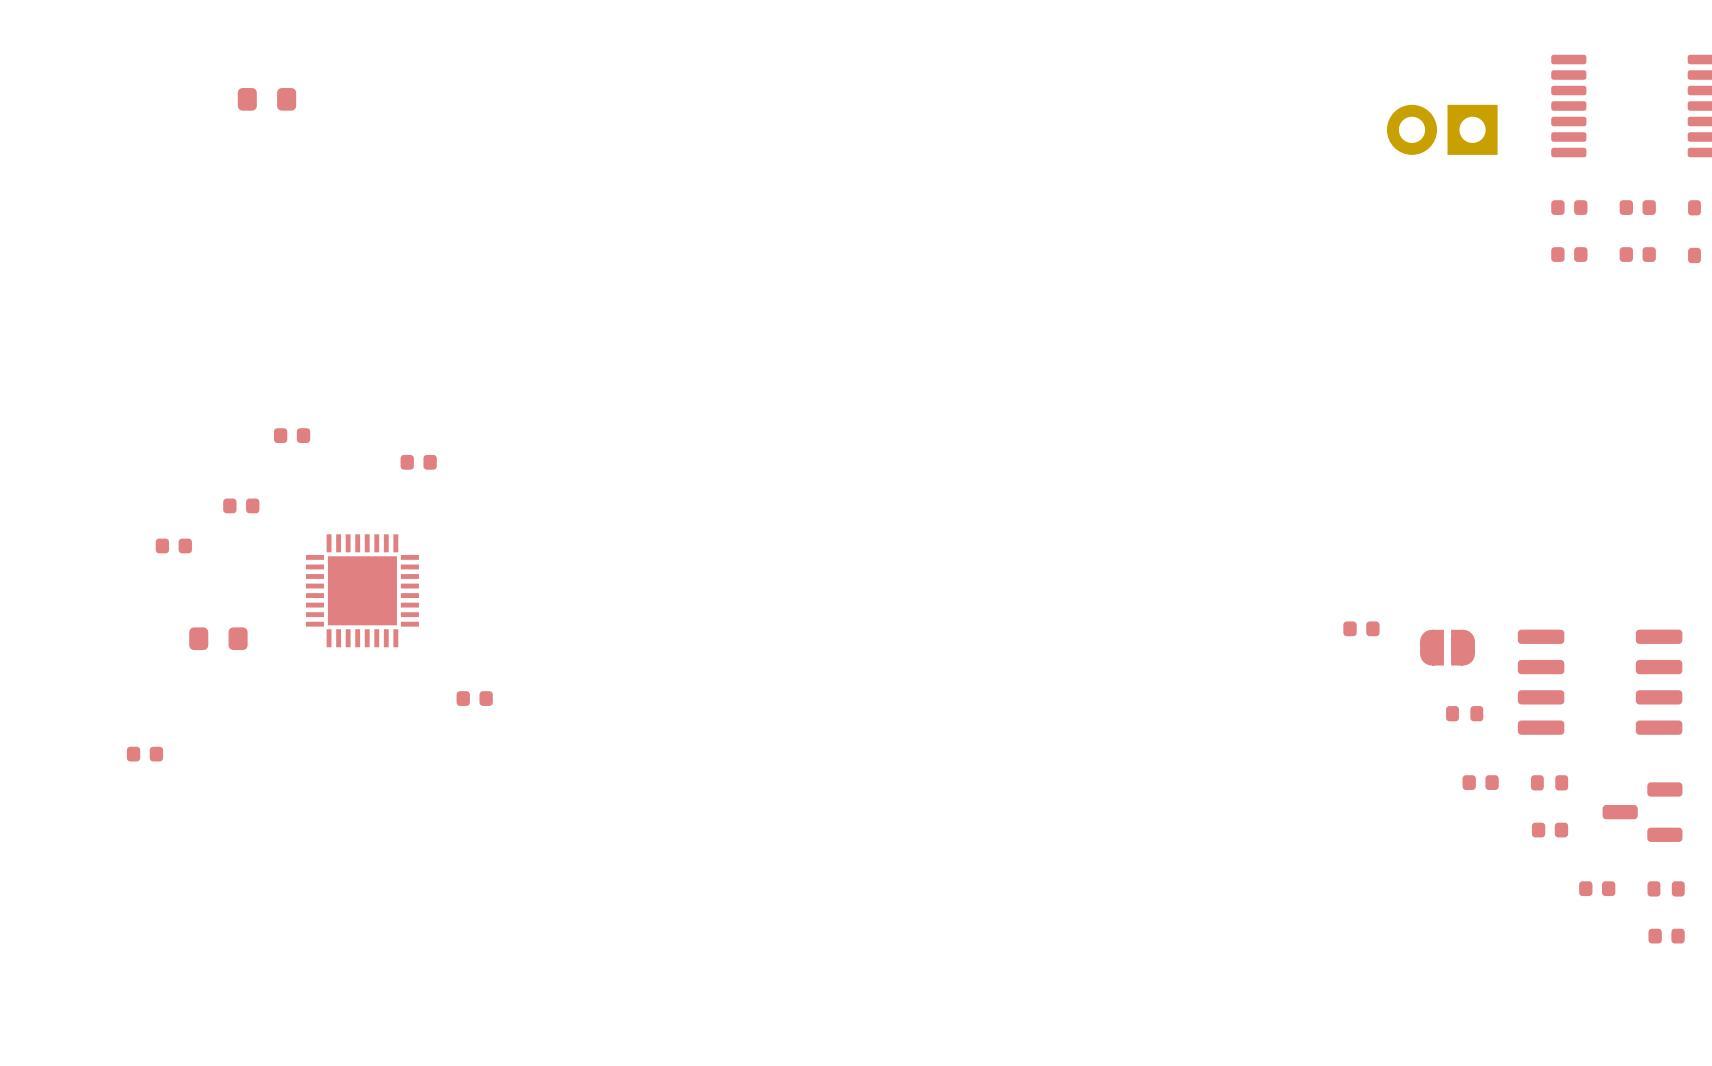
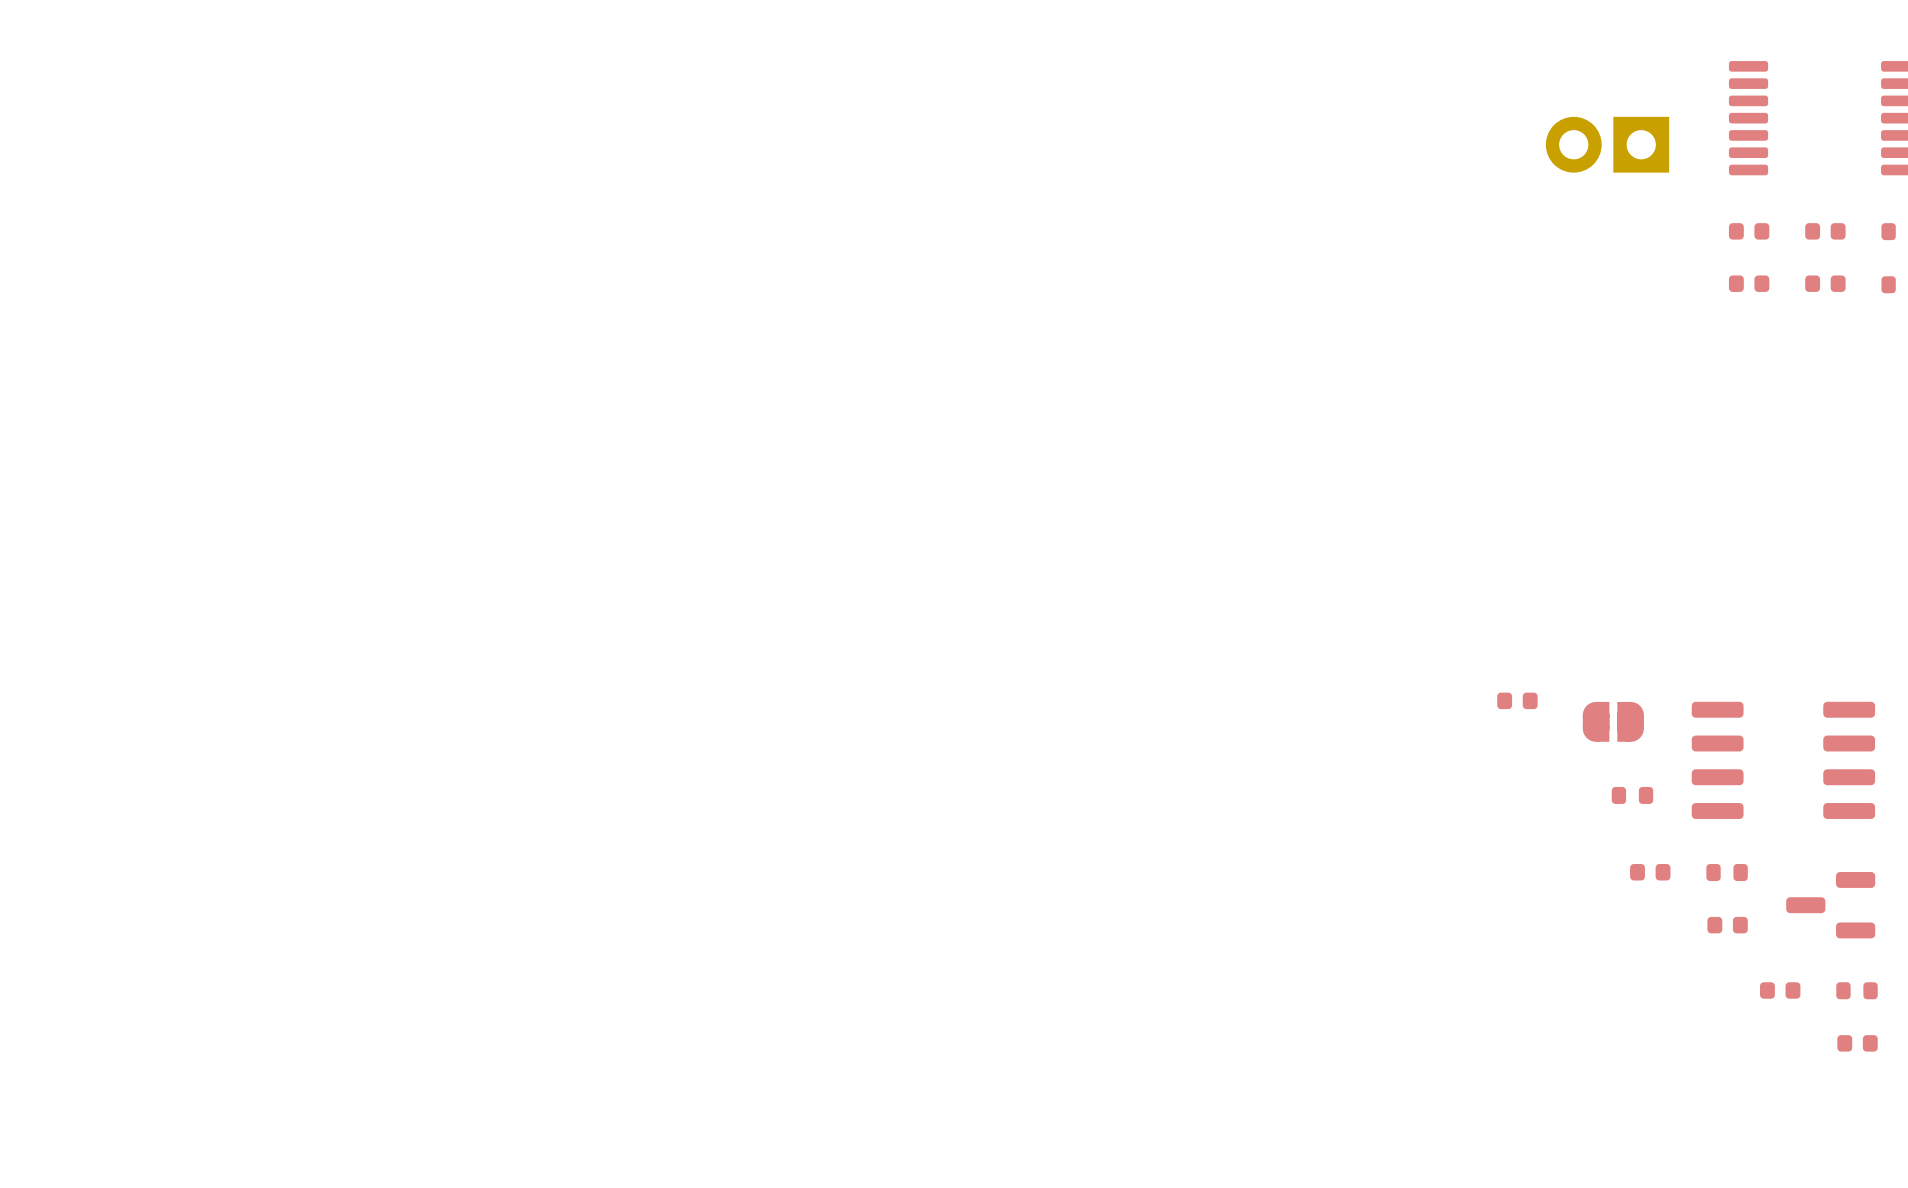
part: (266, 99) -> none
part: (292, 435) -> none
part: (418, 462) -> none
part: (241, 505) -> none
part: (173, 545) -> none
part: (362, 590) -> none
part: (218, 638) -> none
part: (474, 698) -> none
part: (144, 754) -> none

